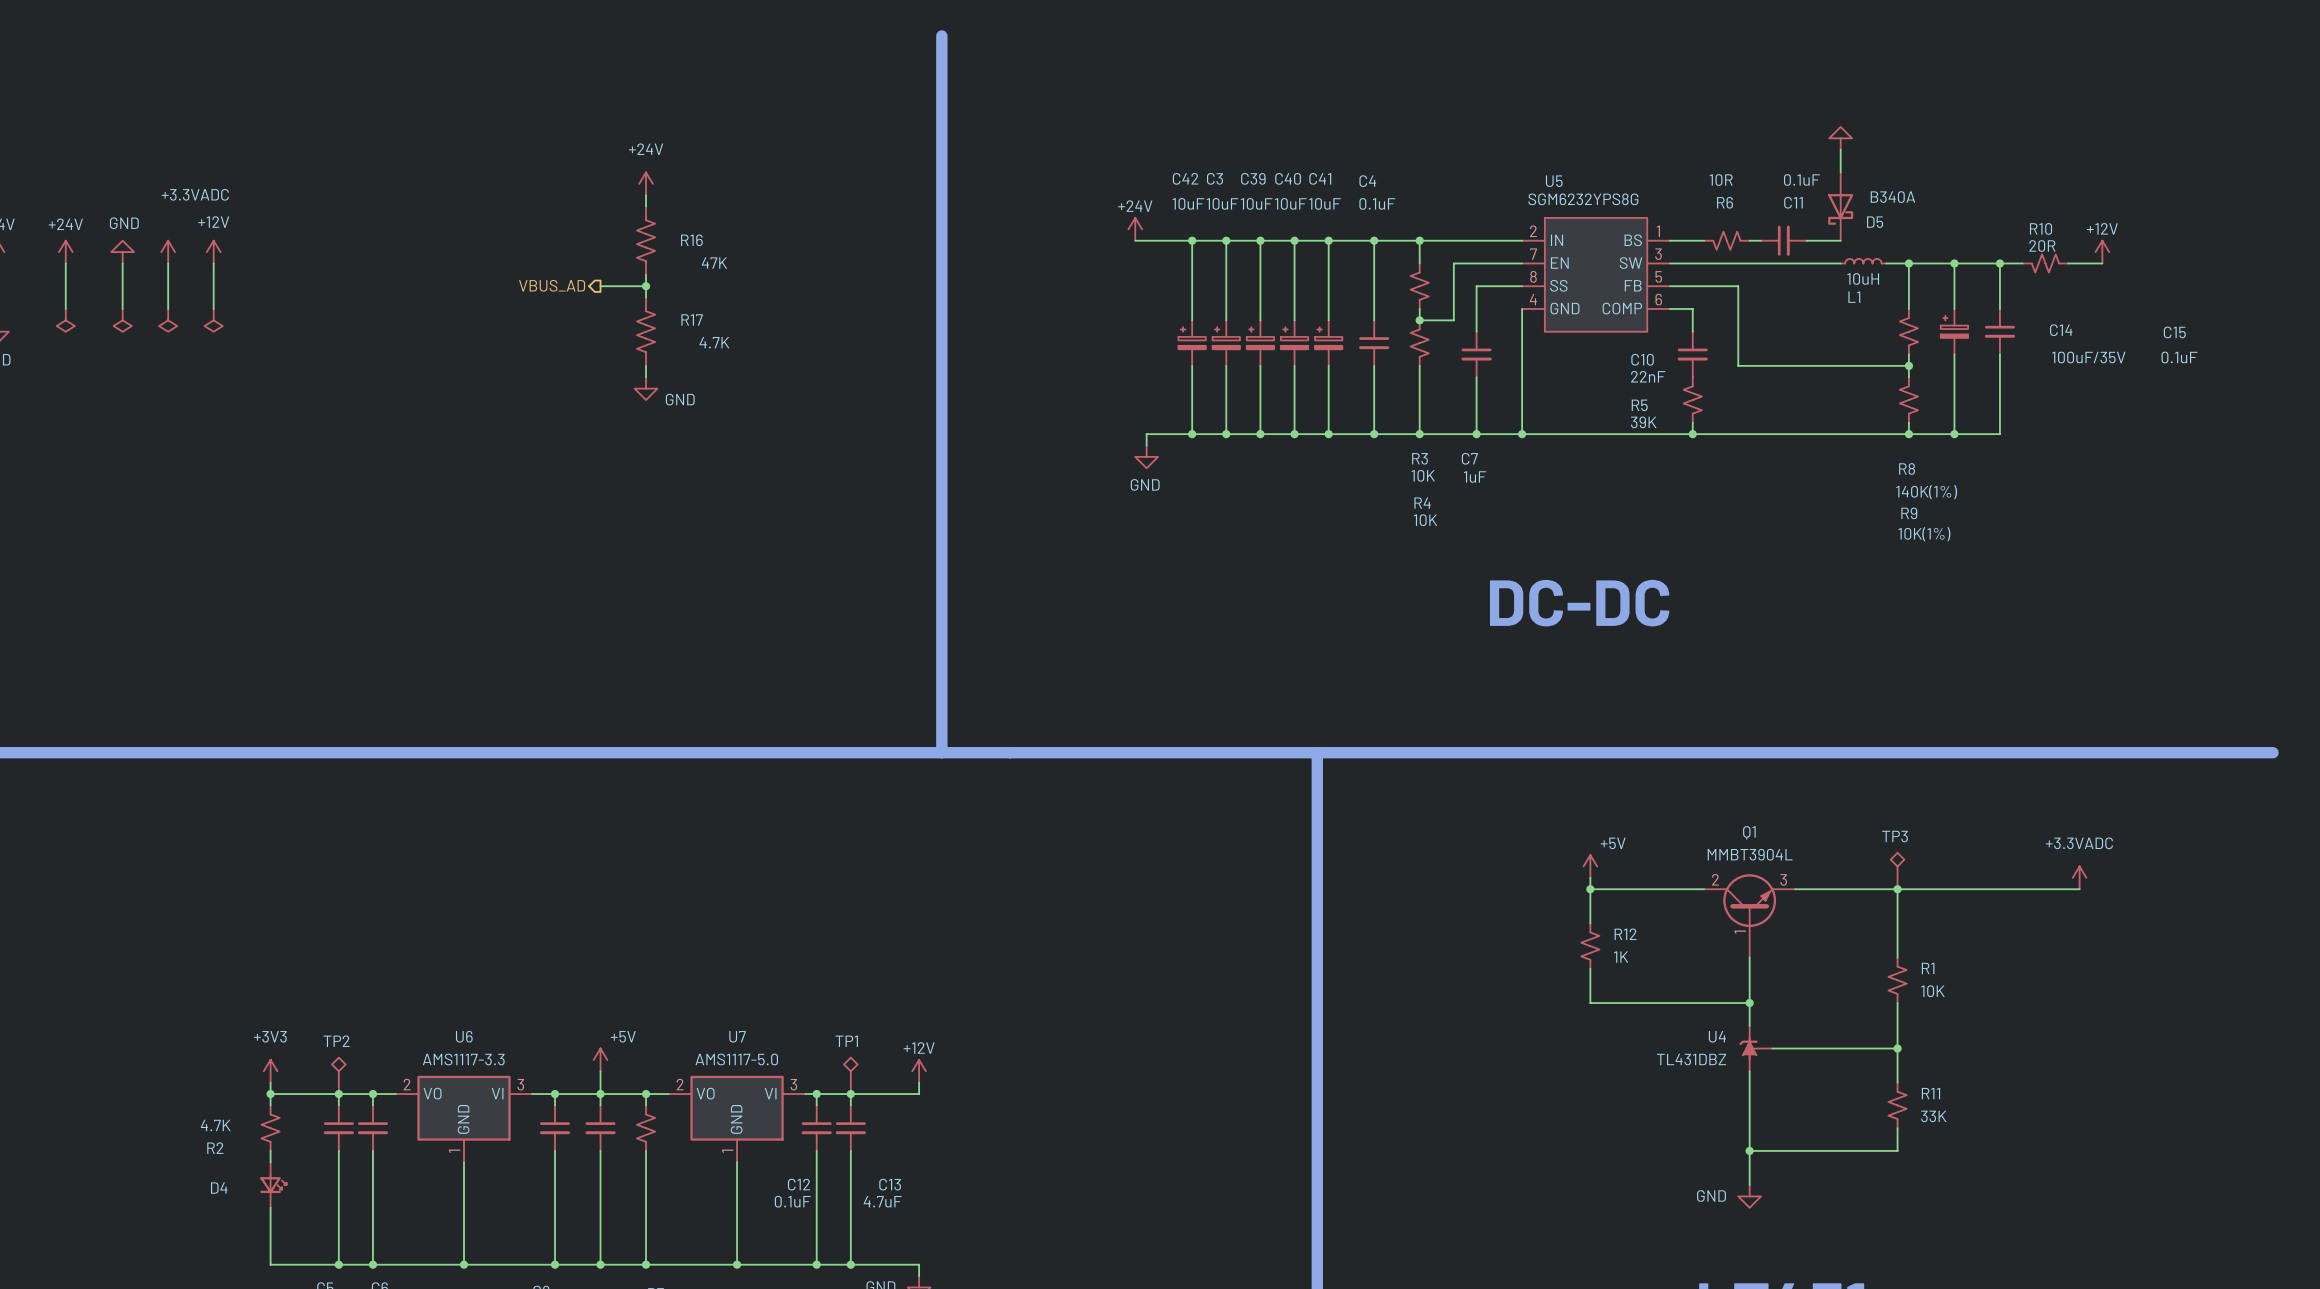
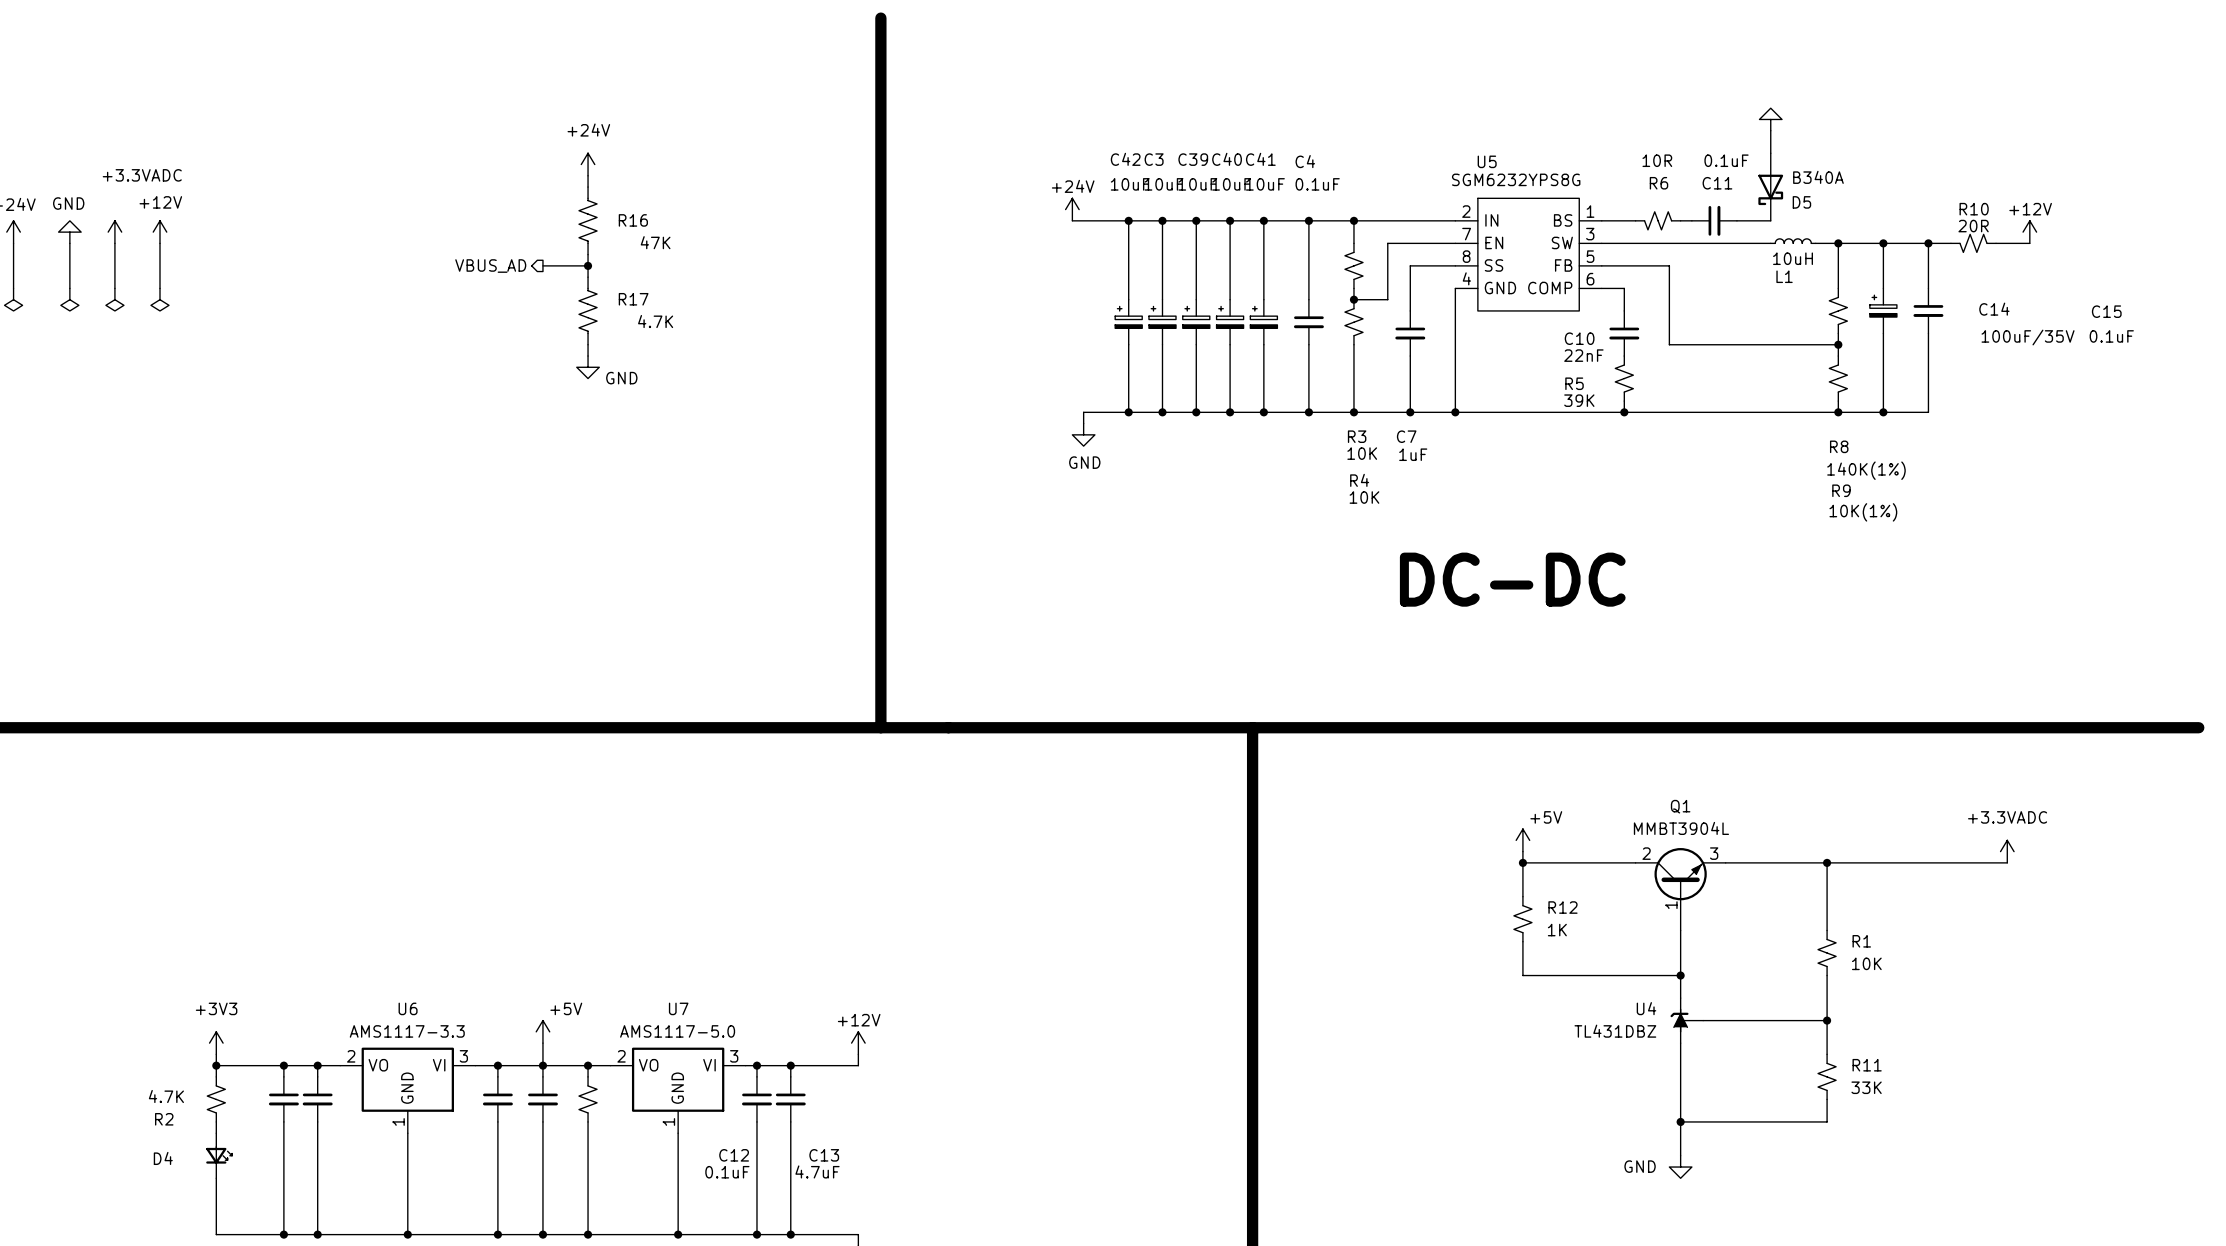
TP3: (1897, 871) -> none
TP2: (338, 1075) -> none
TP1: (850, 1075) -> none

